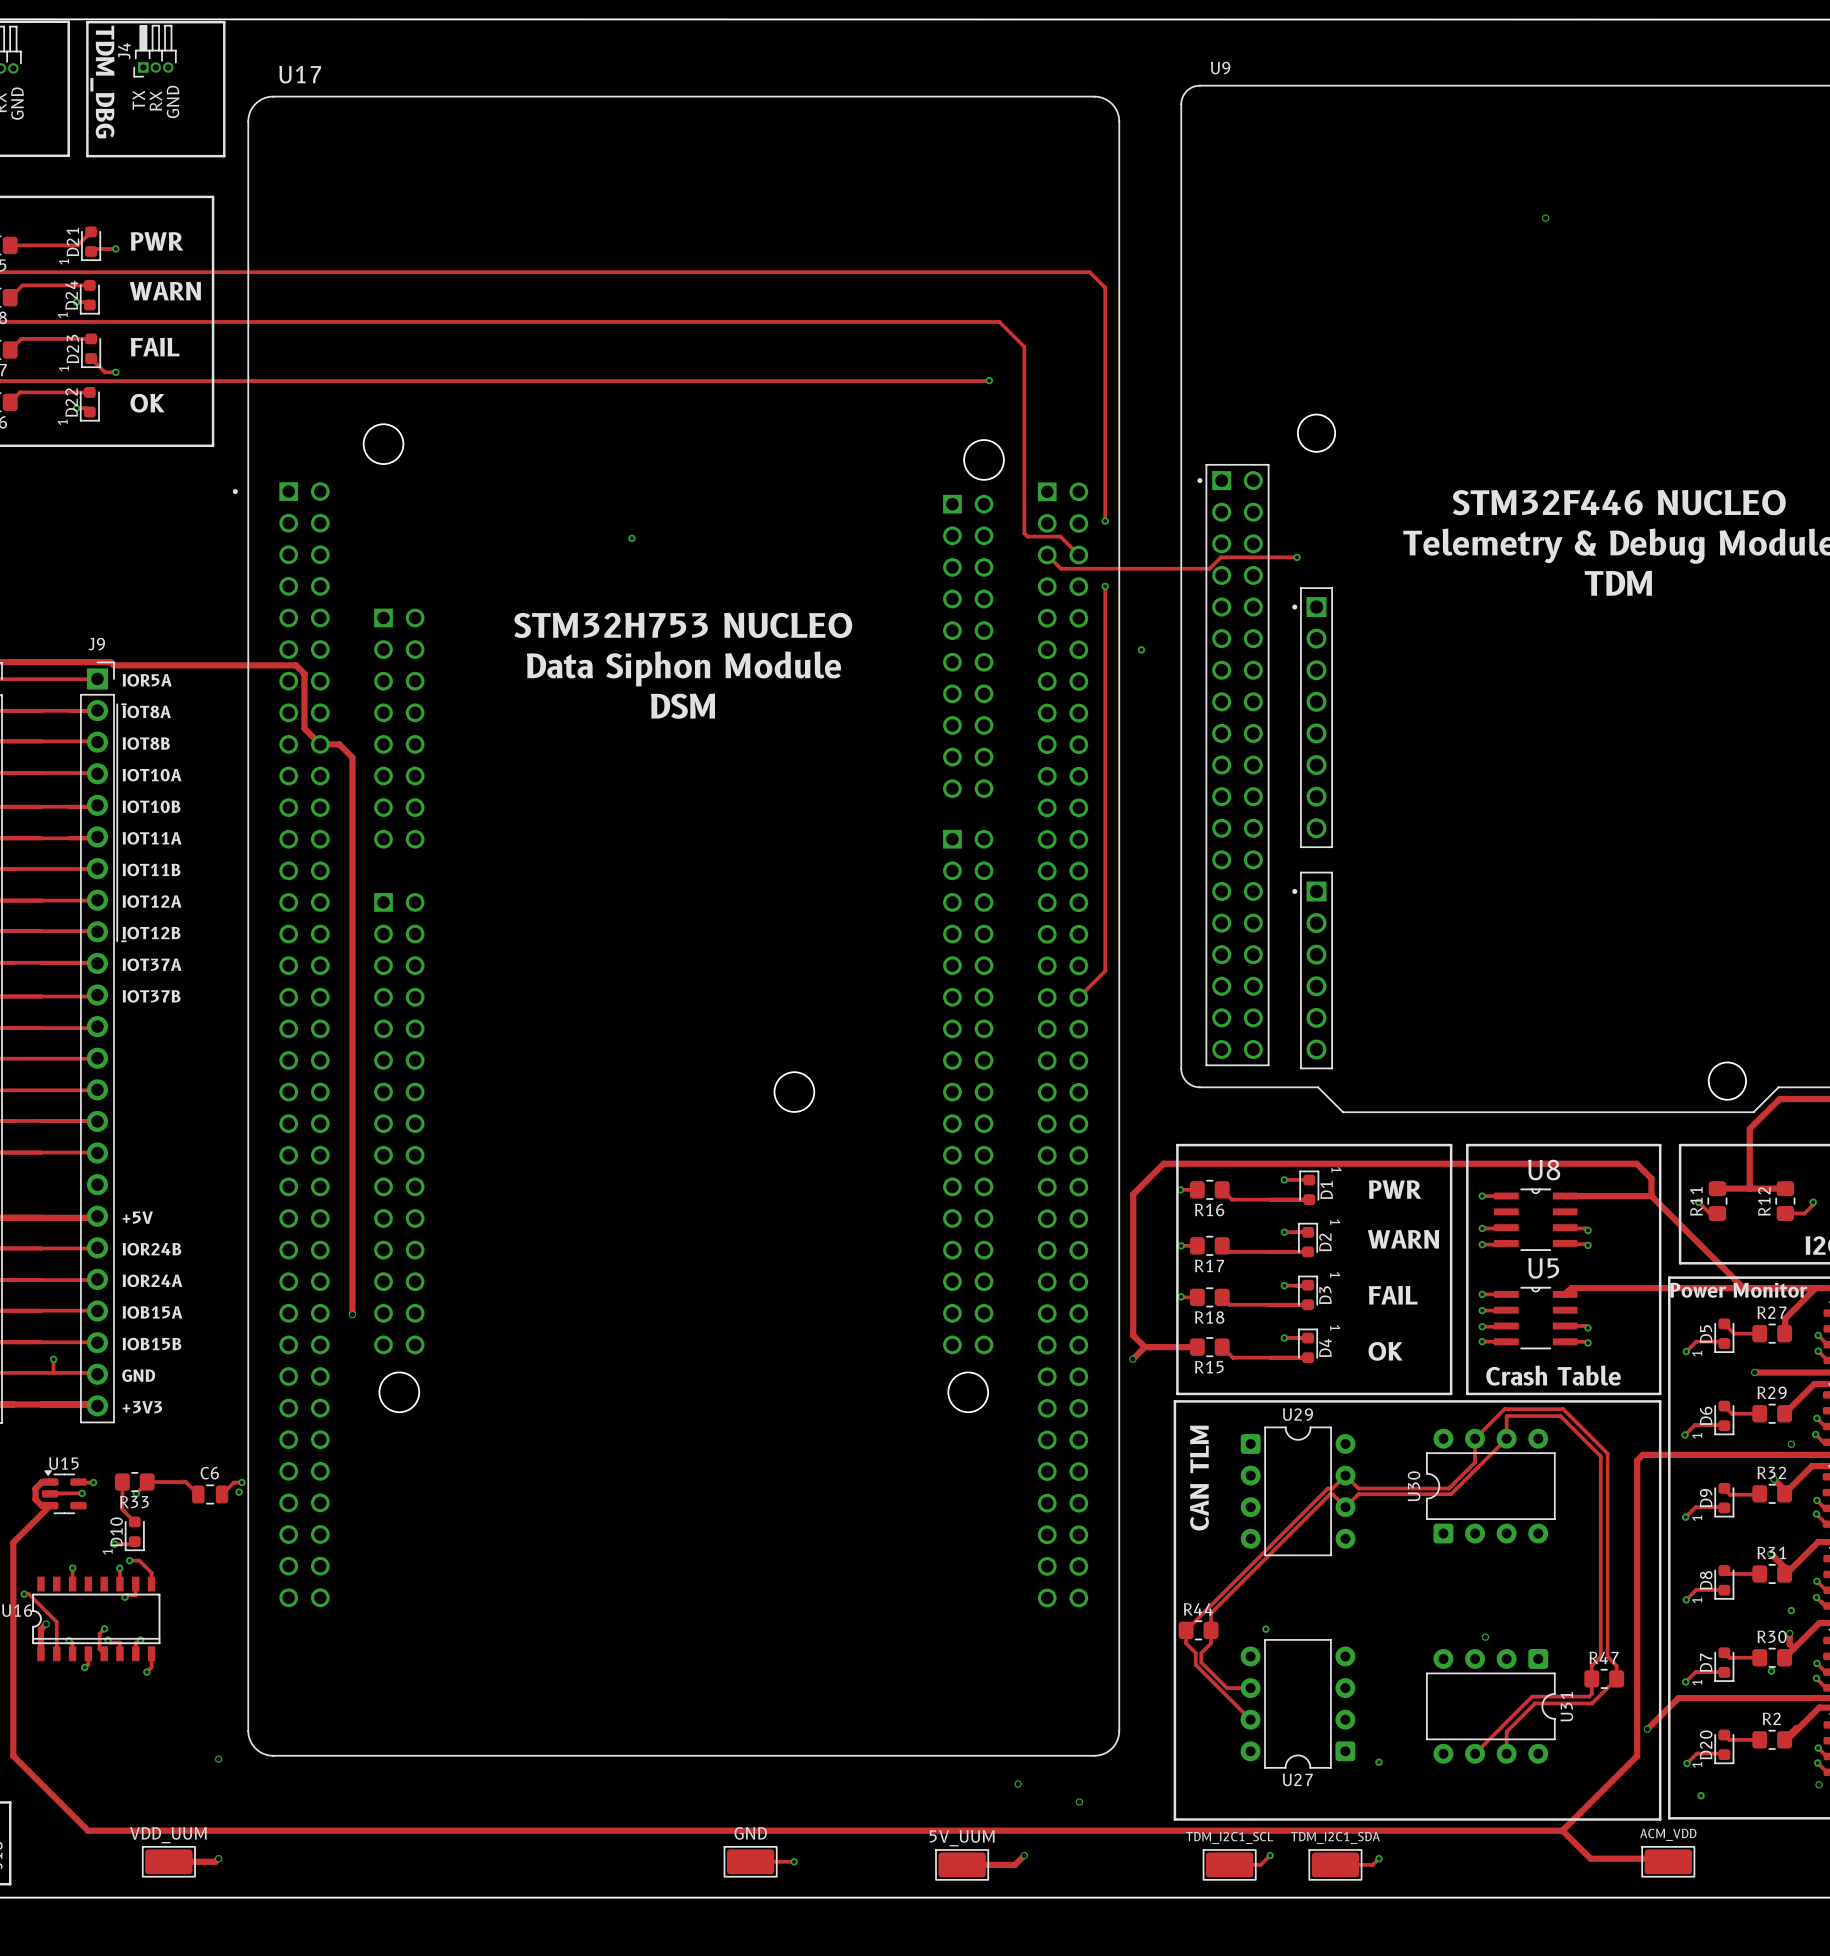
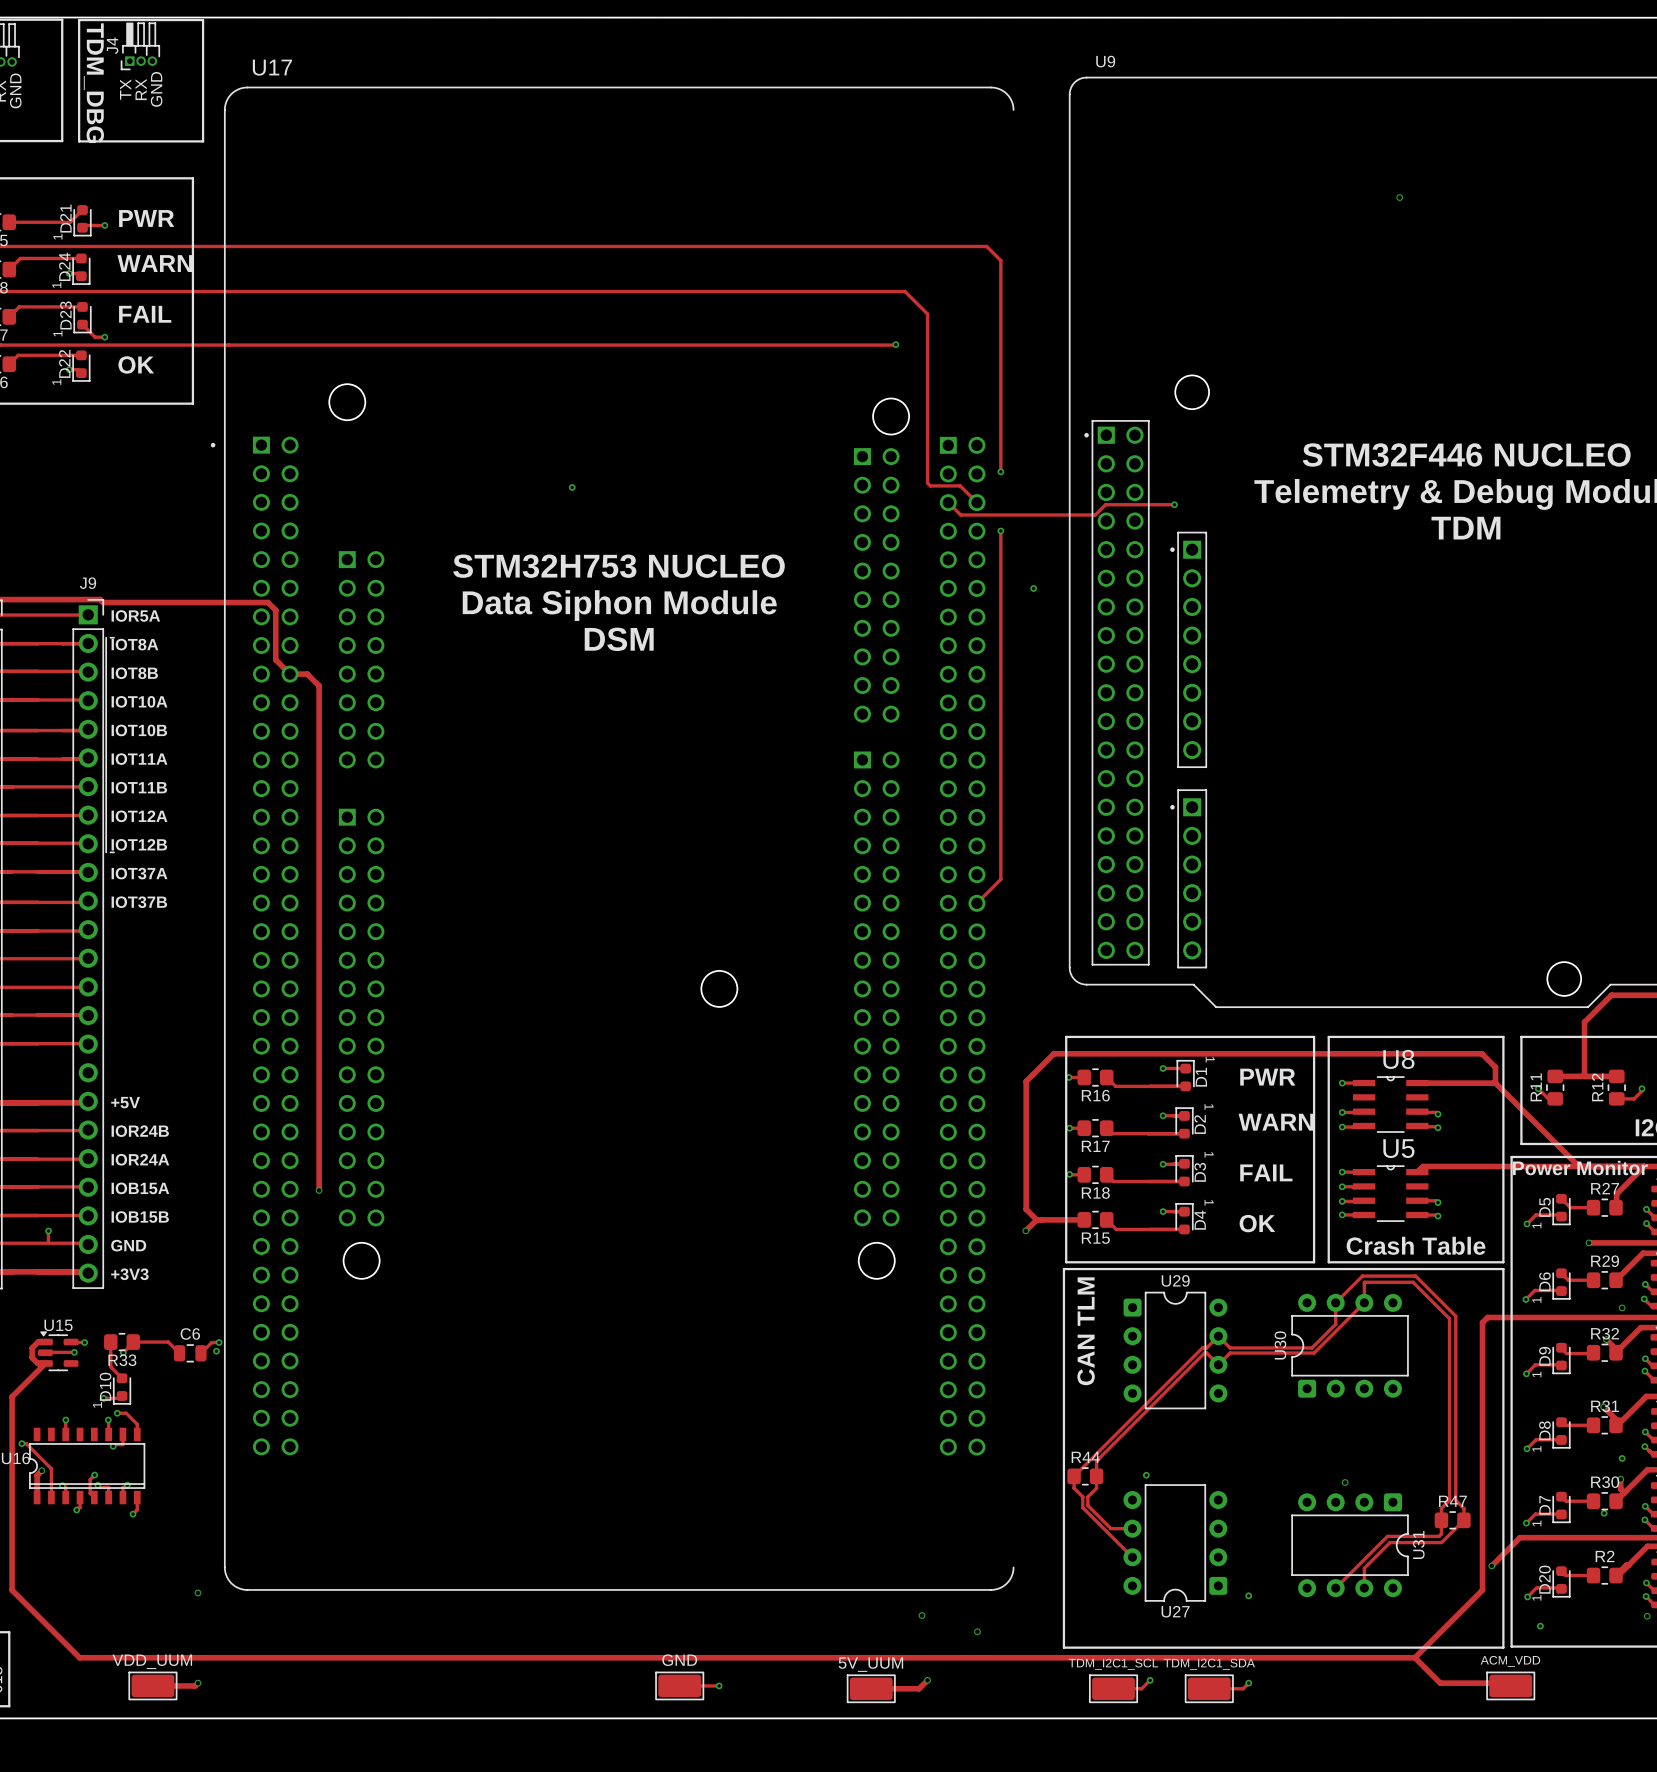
U17 footprint: [232, 95, 1121, 1757] -> [210, 86, 1015, 1591]

